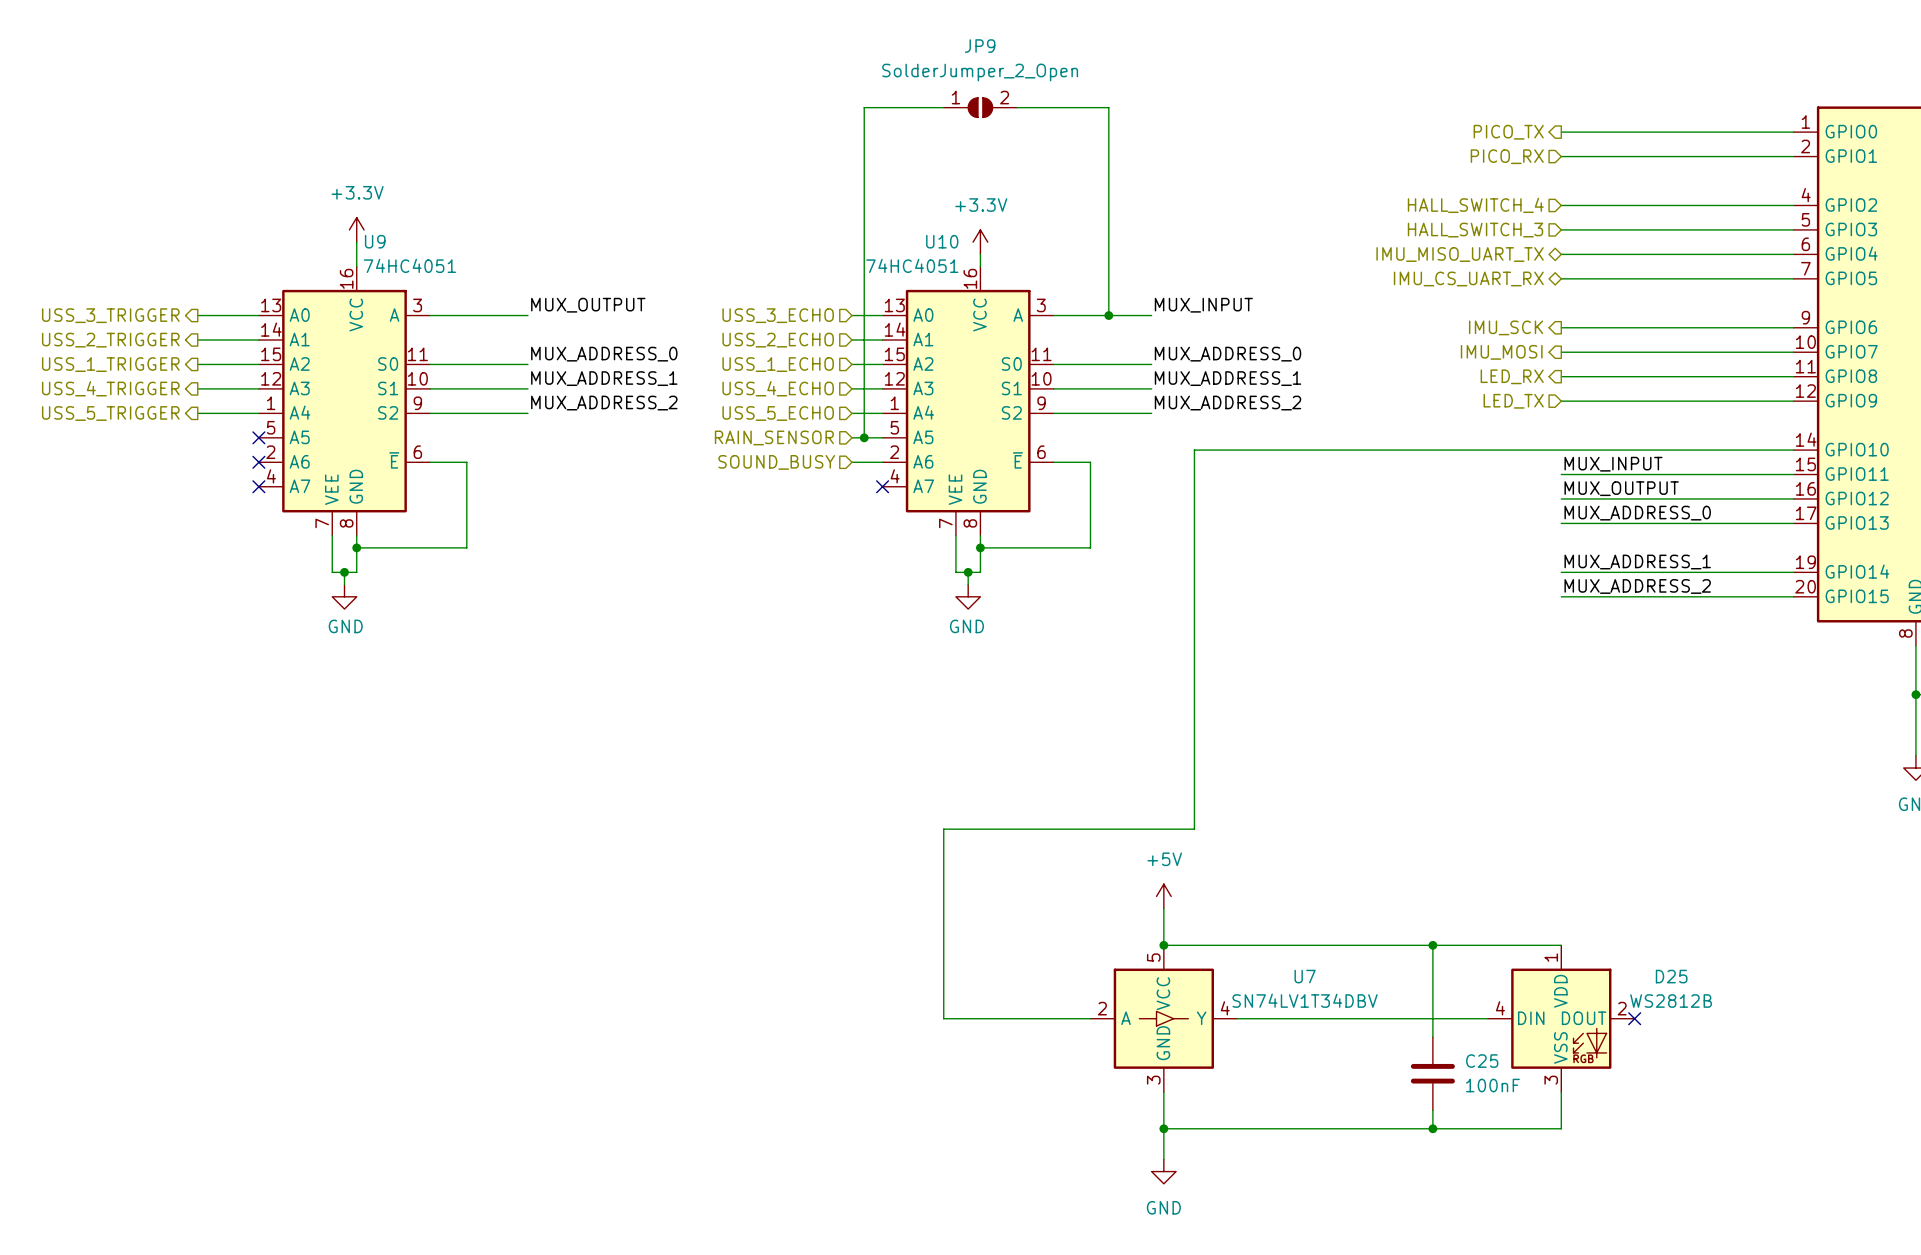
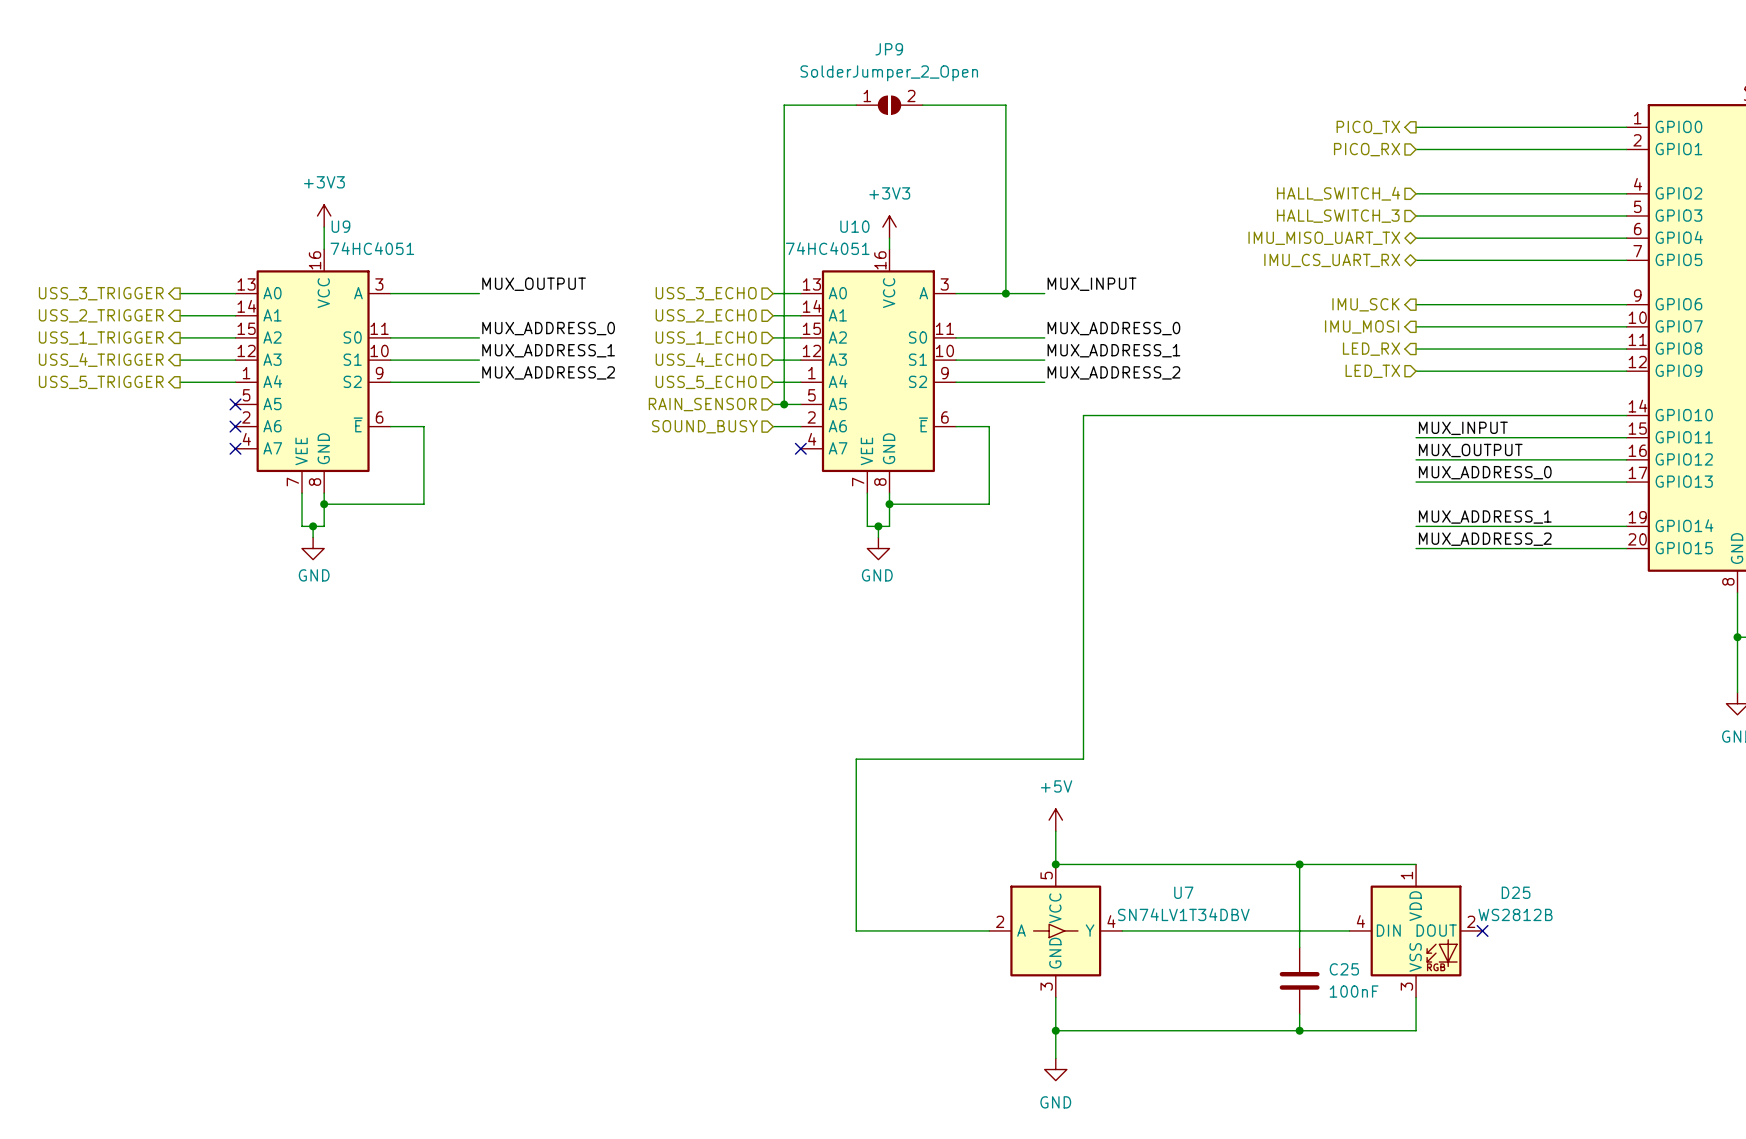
power symbol: +3.3V (356, 229) -> +3V3 (324, 215)
power symbol: +3.3V (980, 242) -> +3V3 (889, 227)

